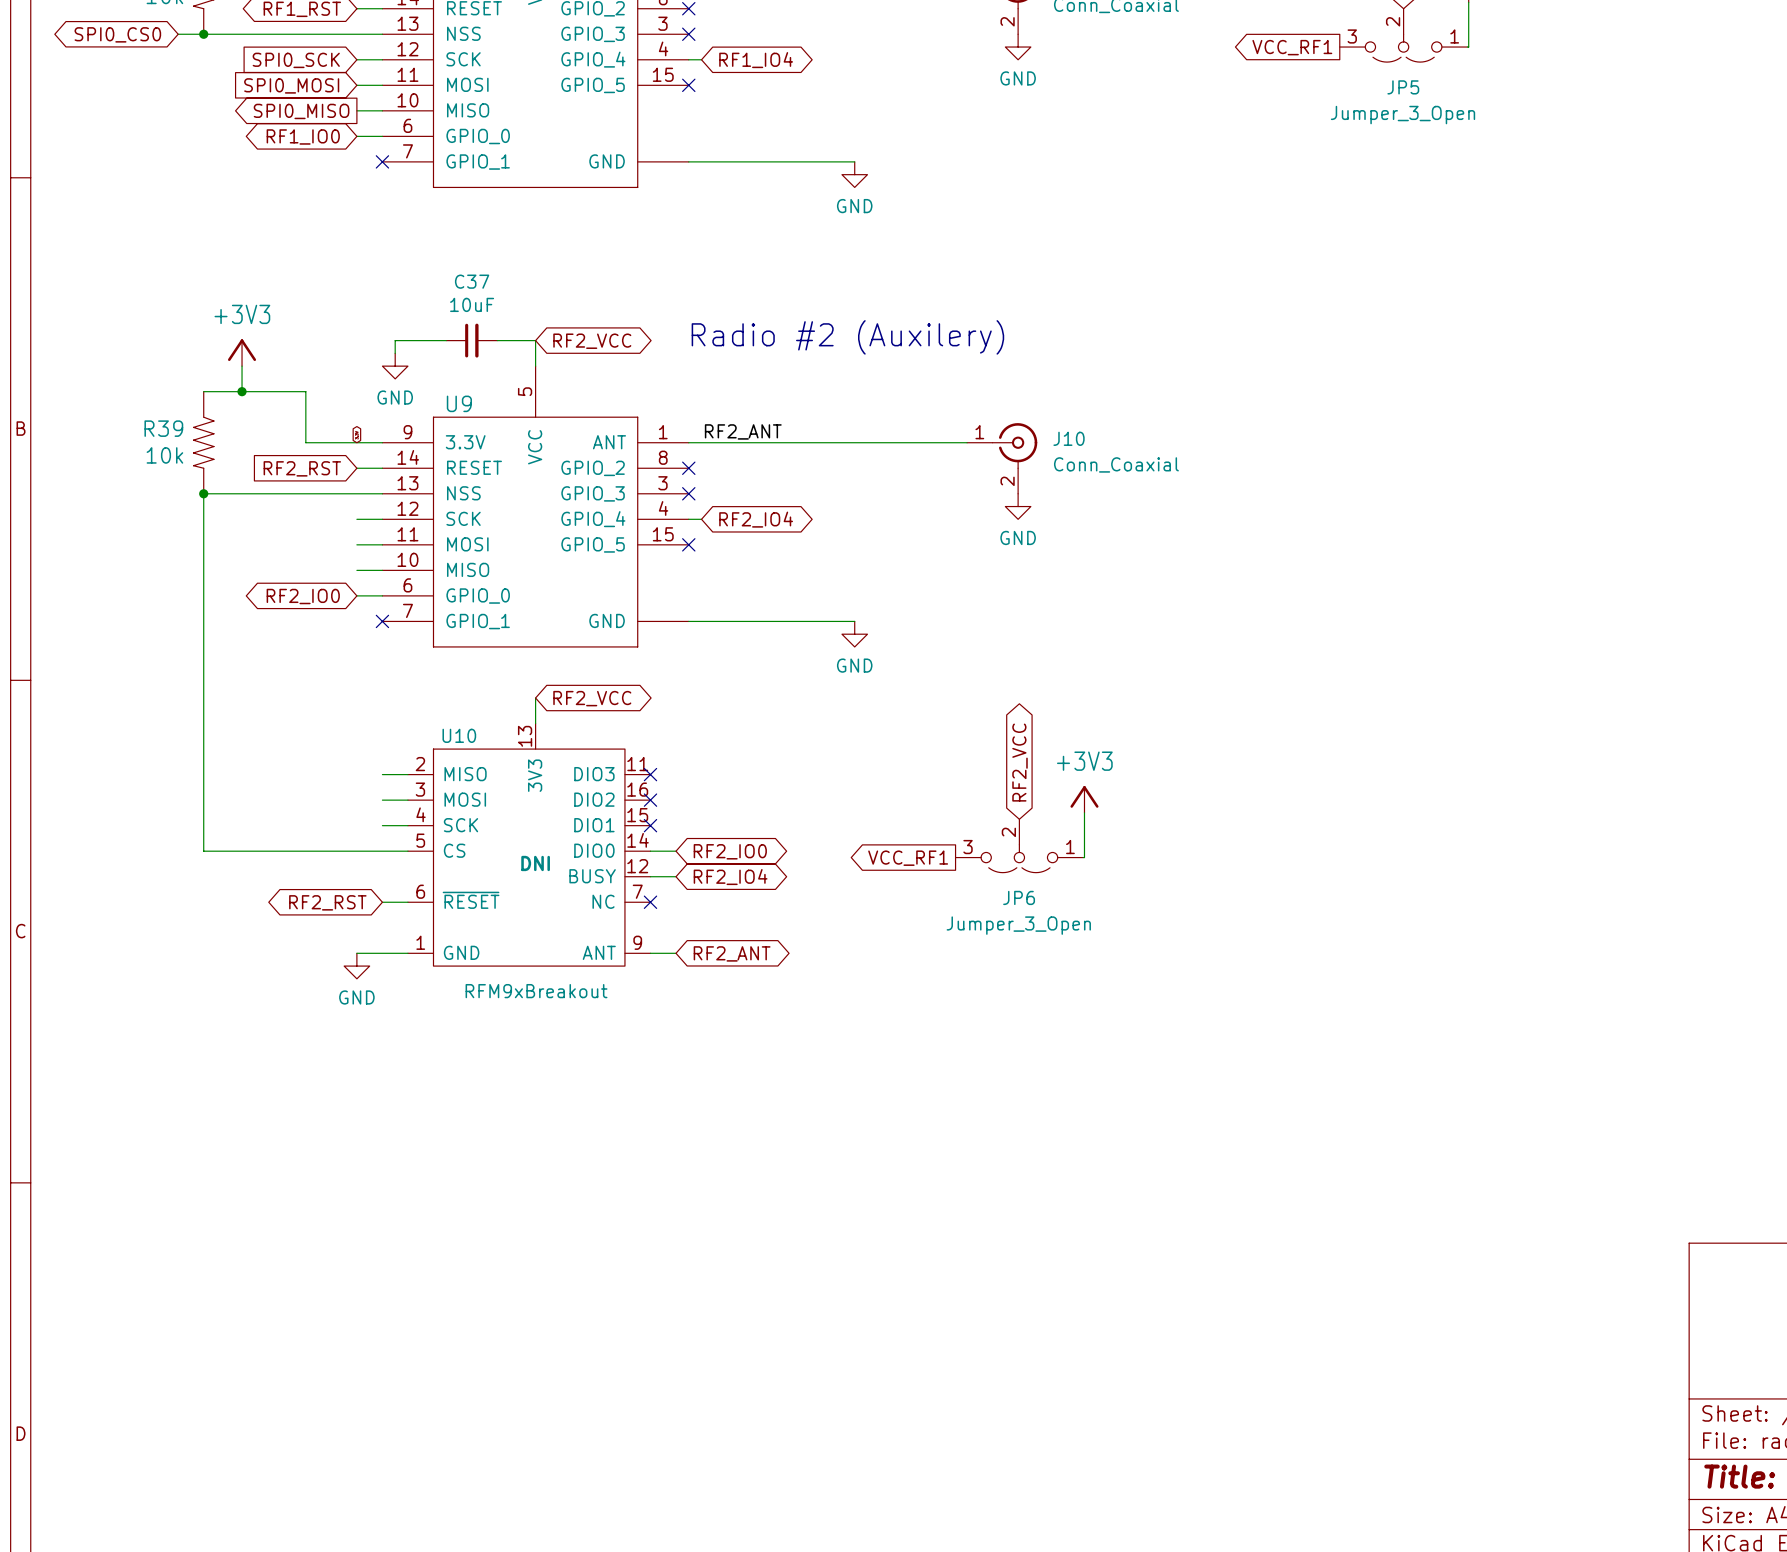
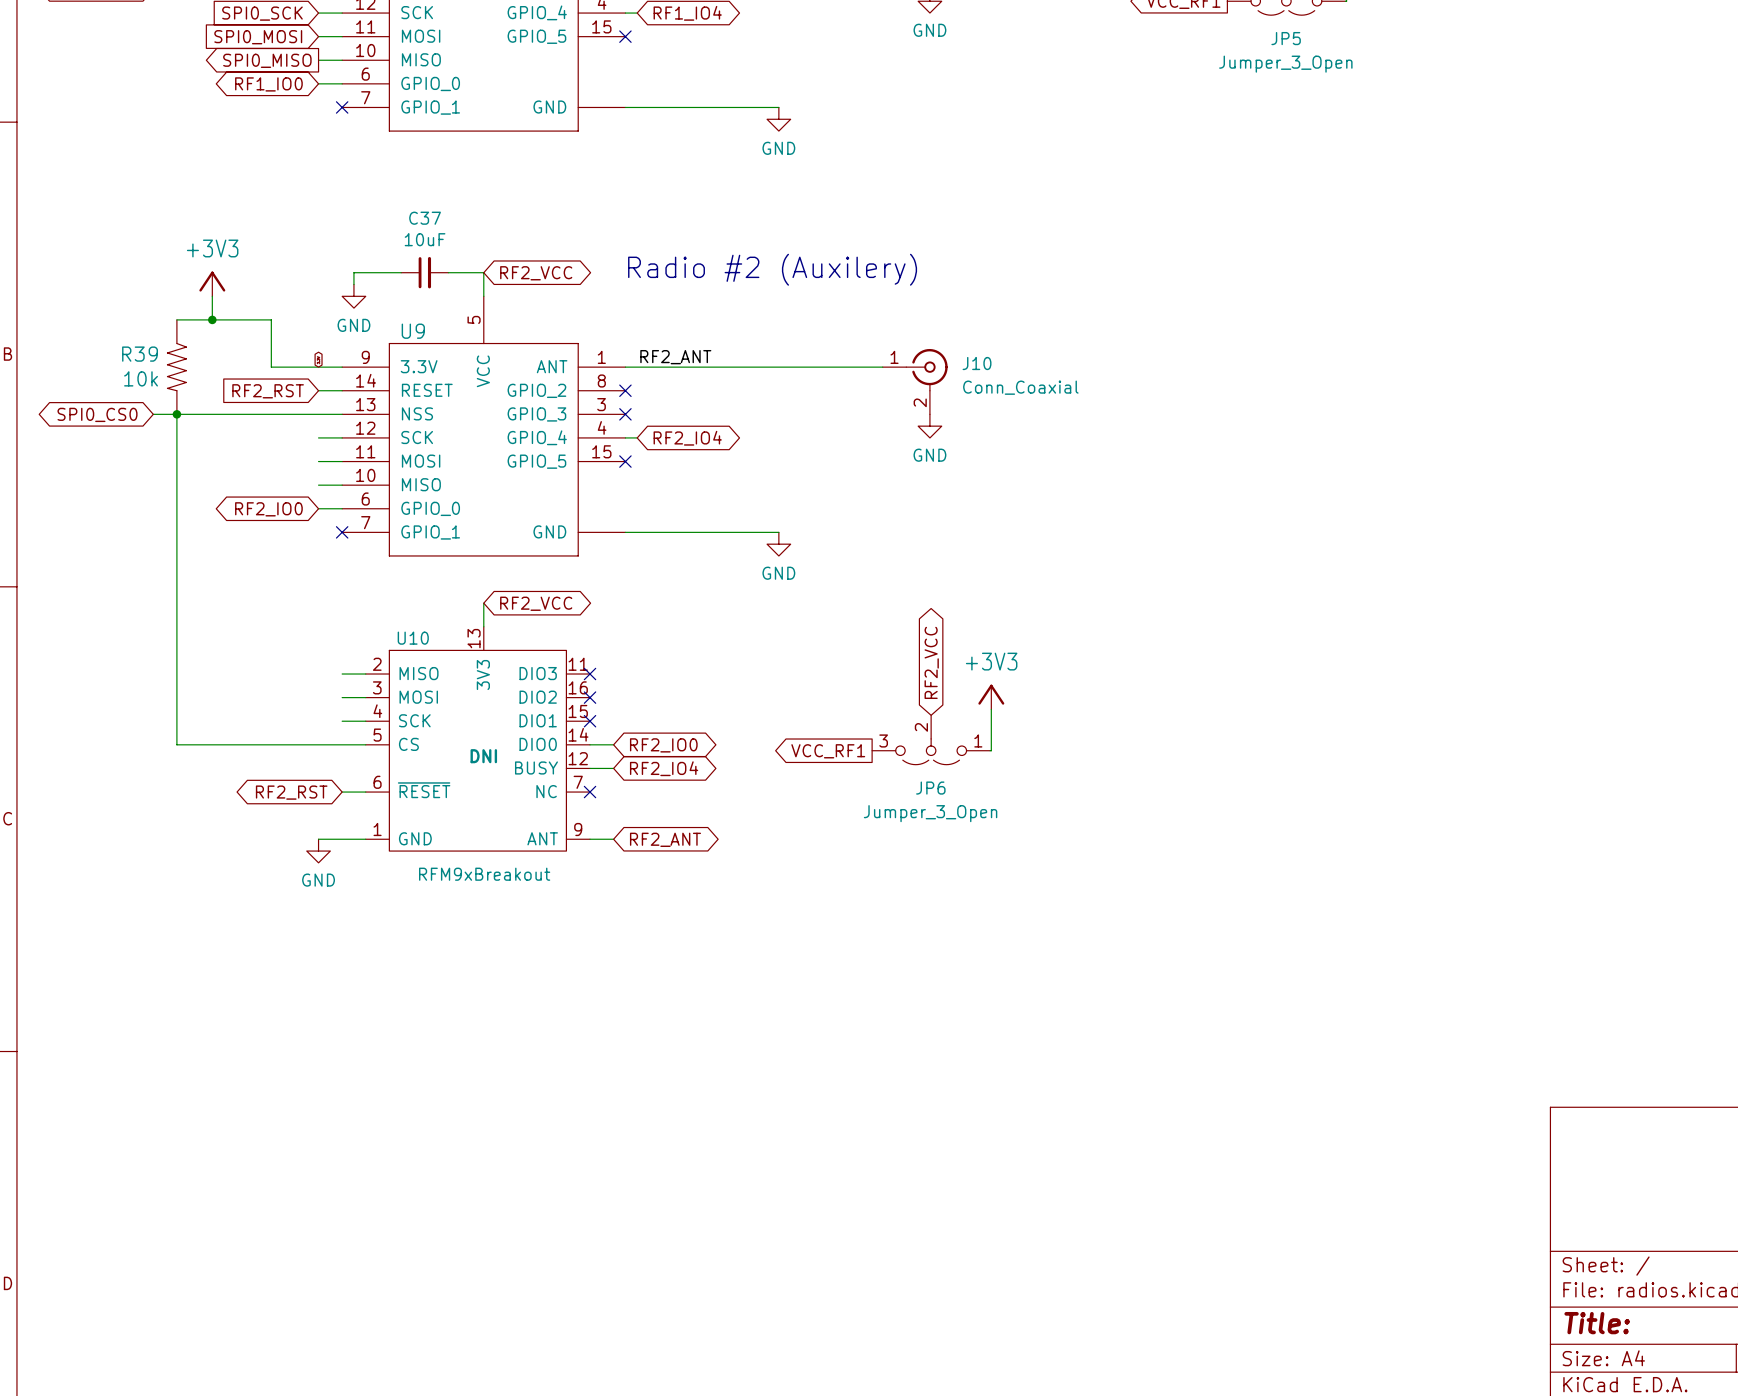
wire: none -> (153, 414) (176, 414)
global label: none -> SPI0_CS0 (97, 414)

